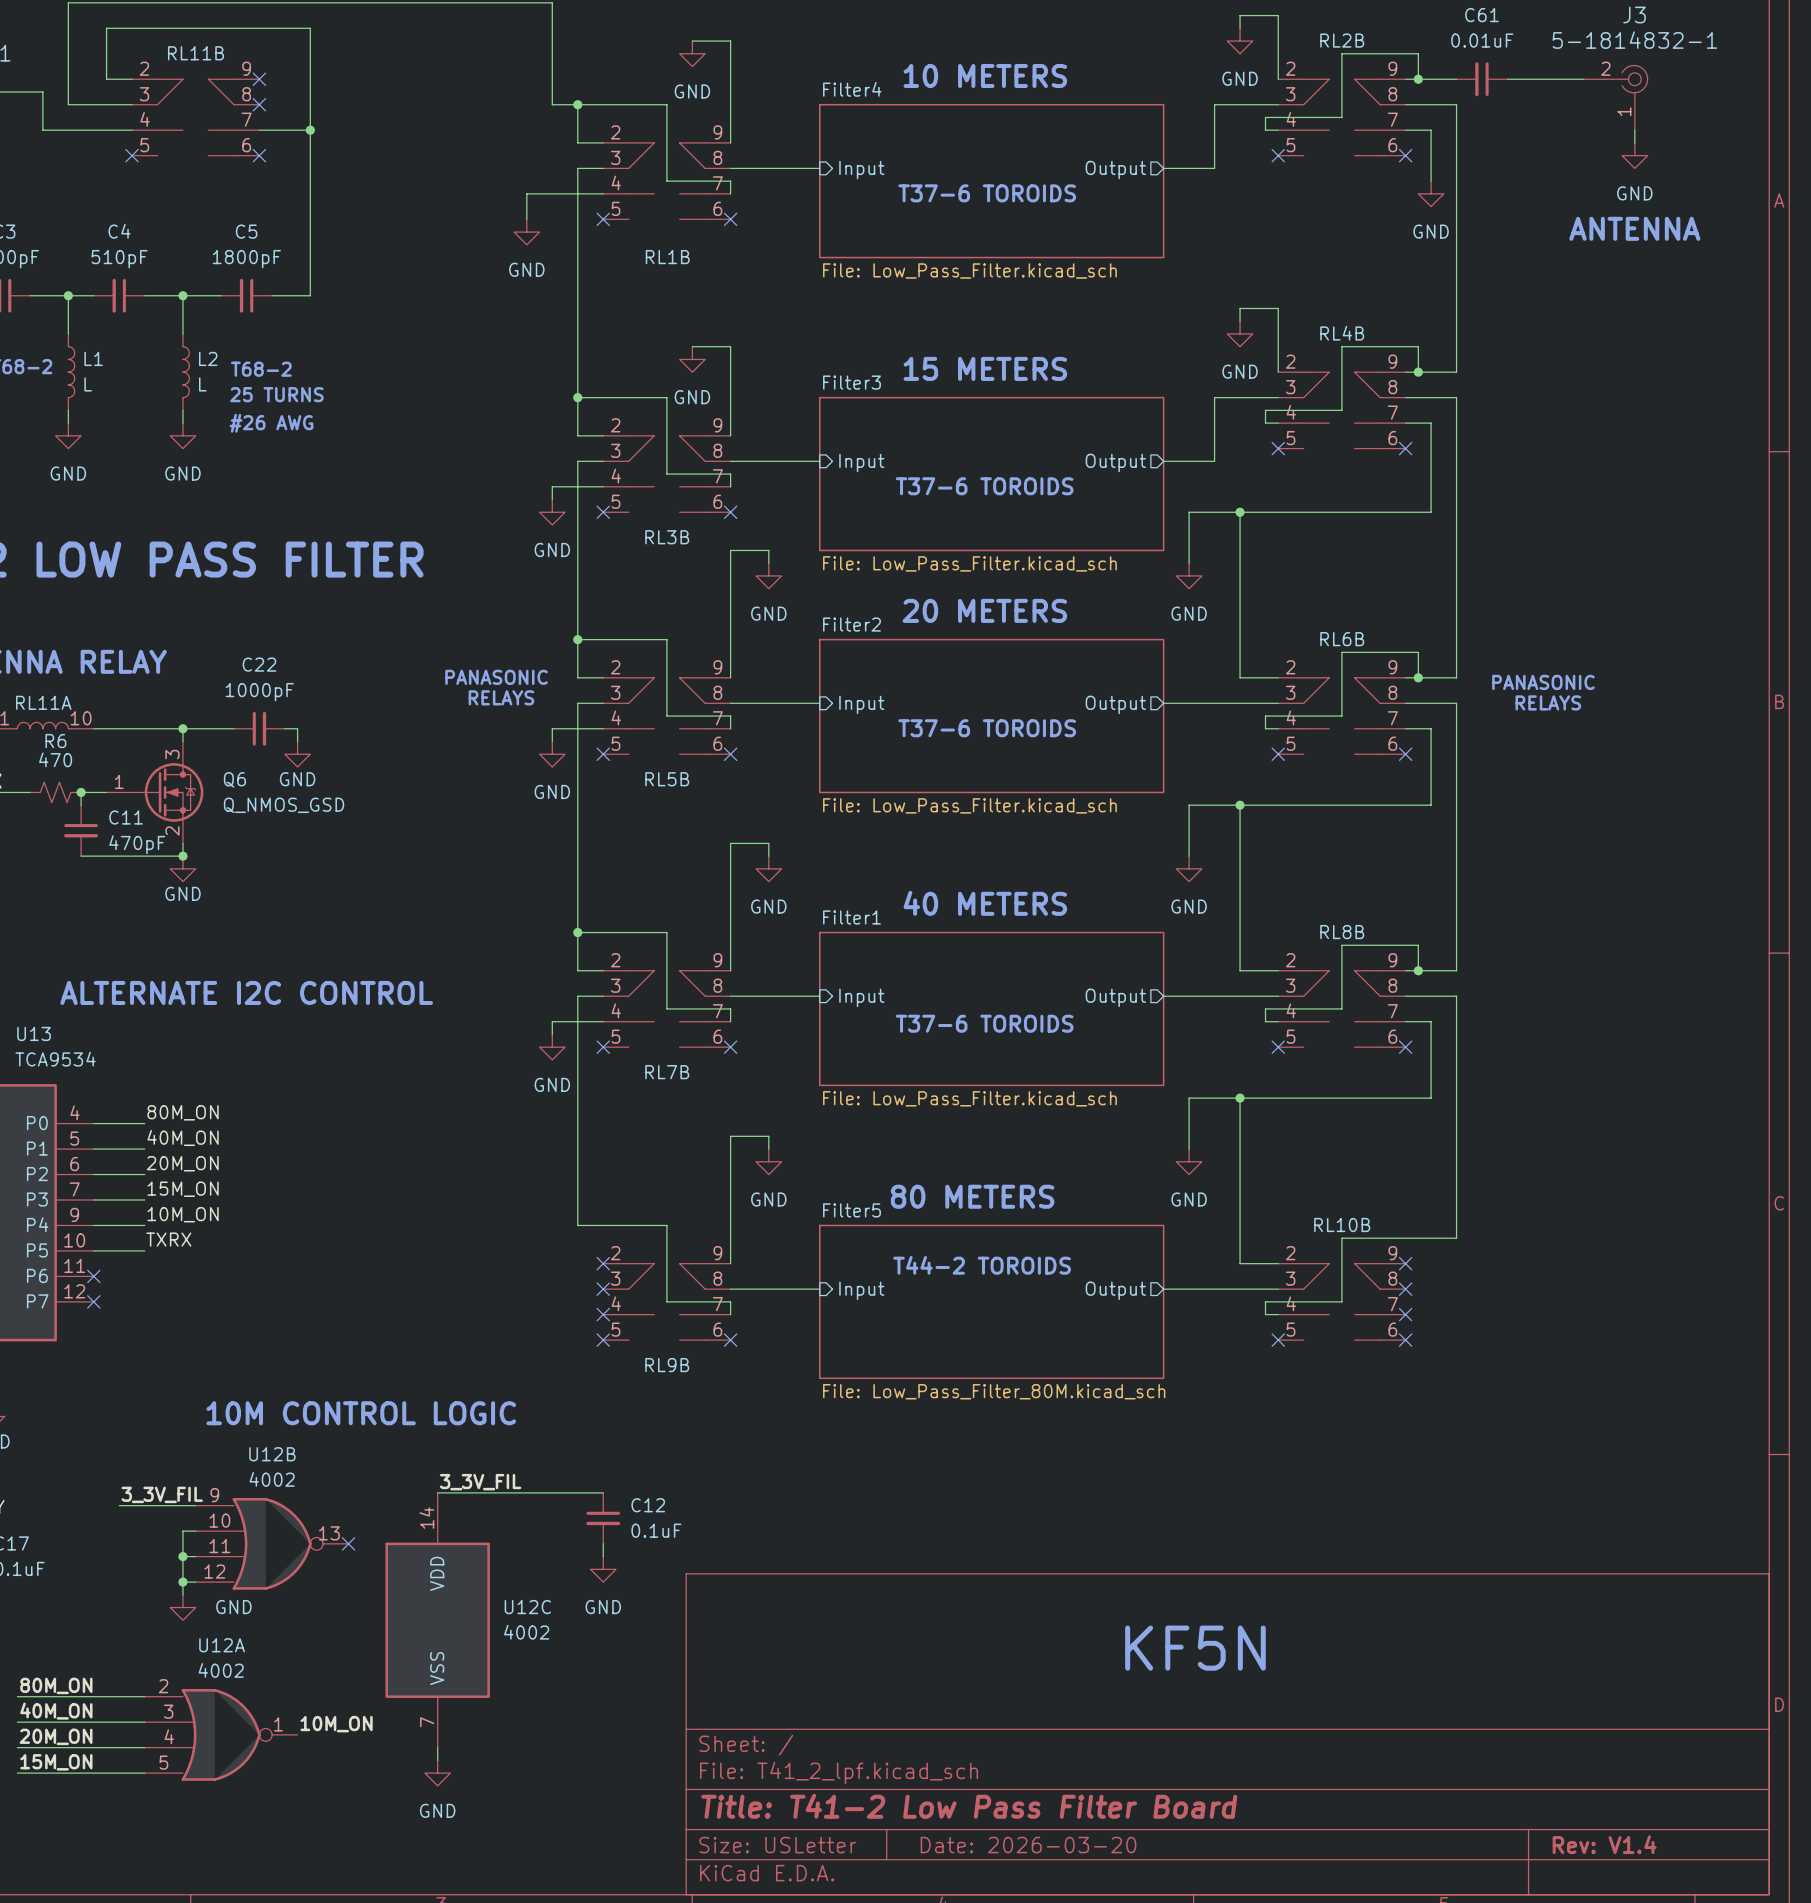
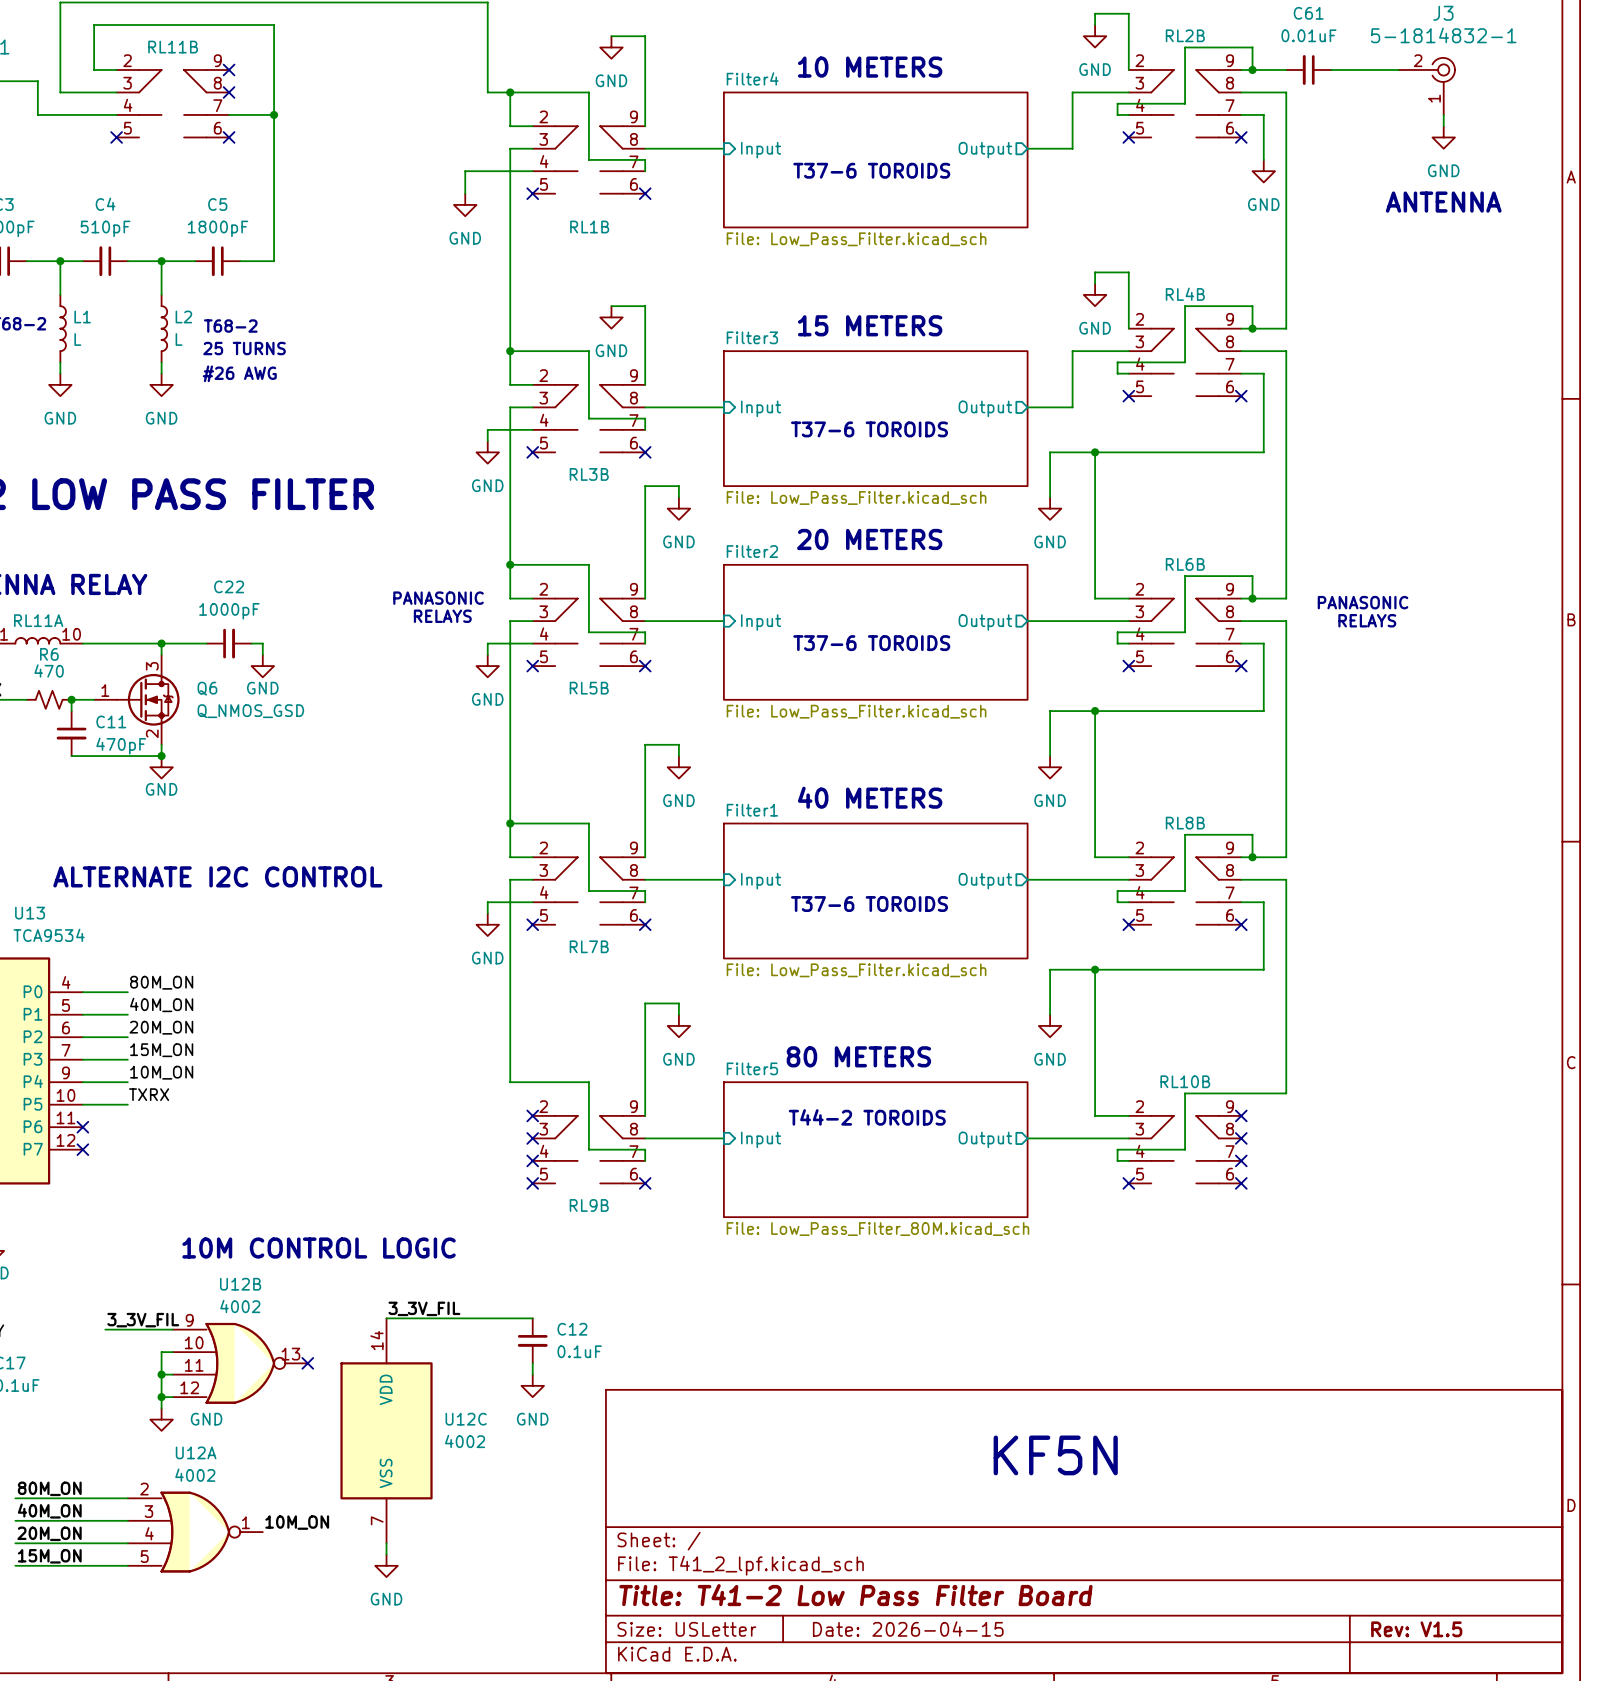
title block: Rev: V1.4 (1604, 1844) -> Rev: V1.5 (1416, 1629)
title block: Date: 2026-03-20 (1028, 1845) -> Date: 2026-04-15 (908, 1629)

